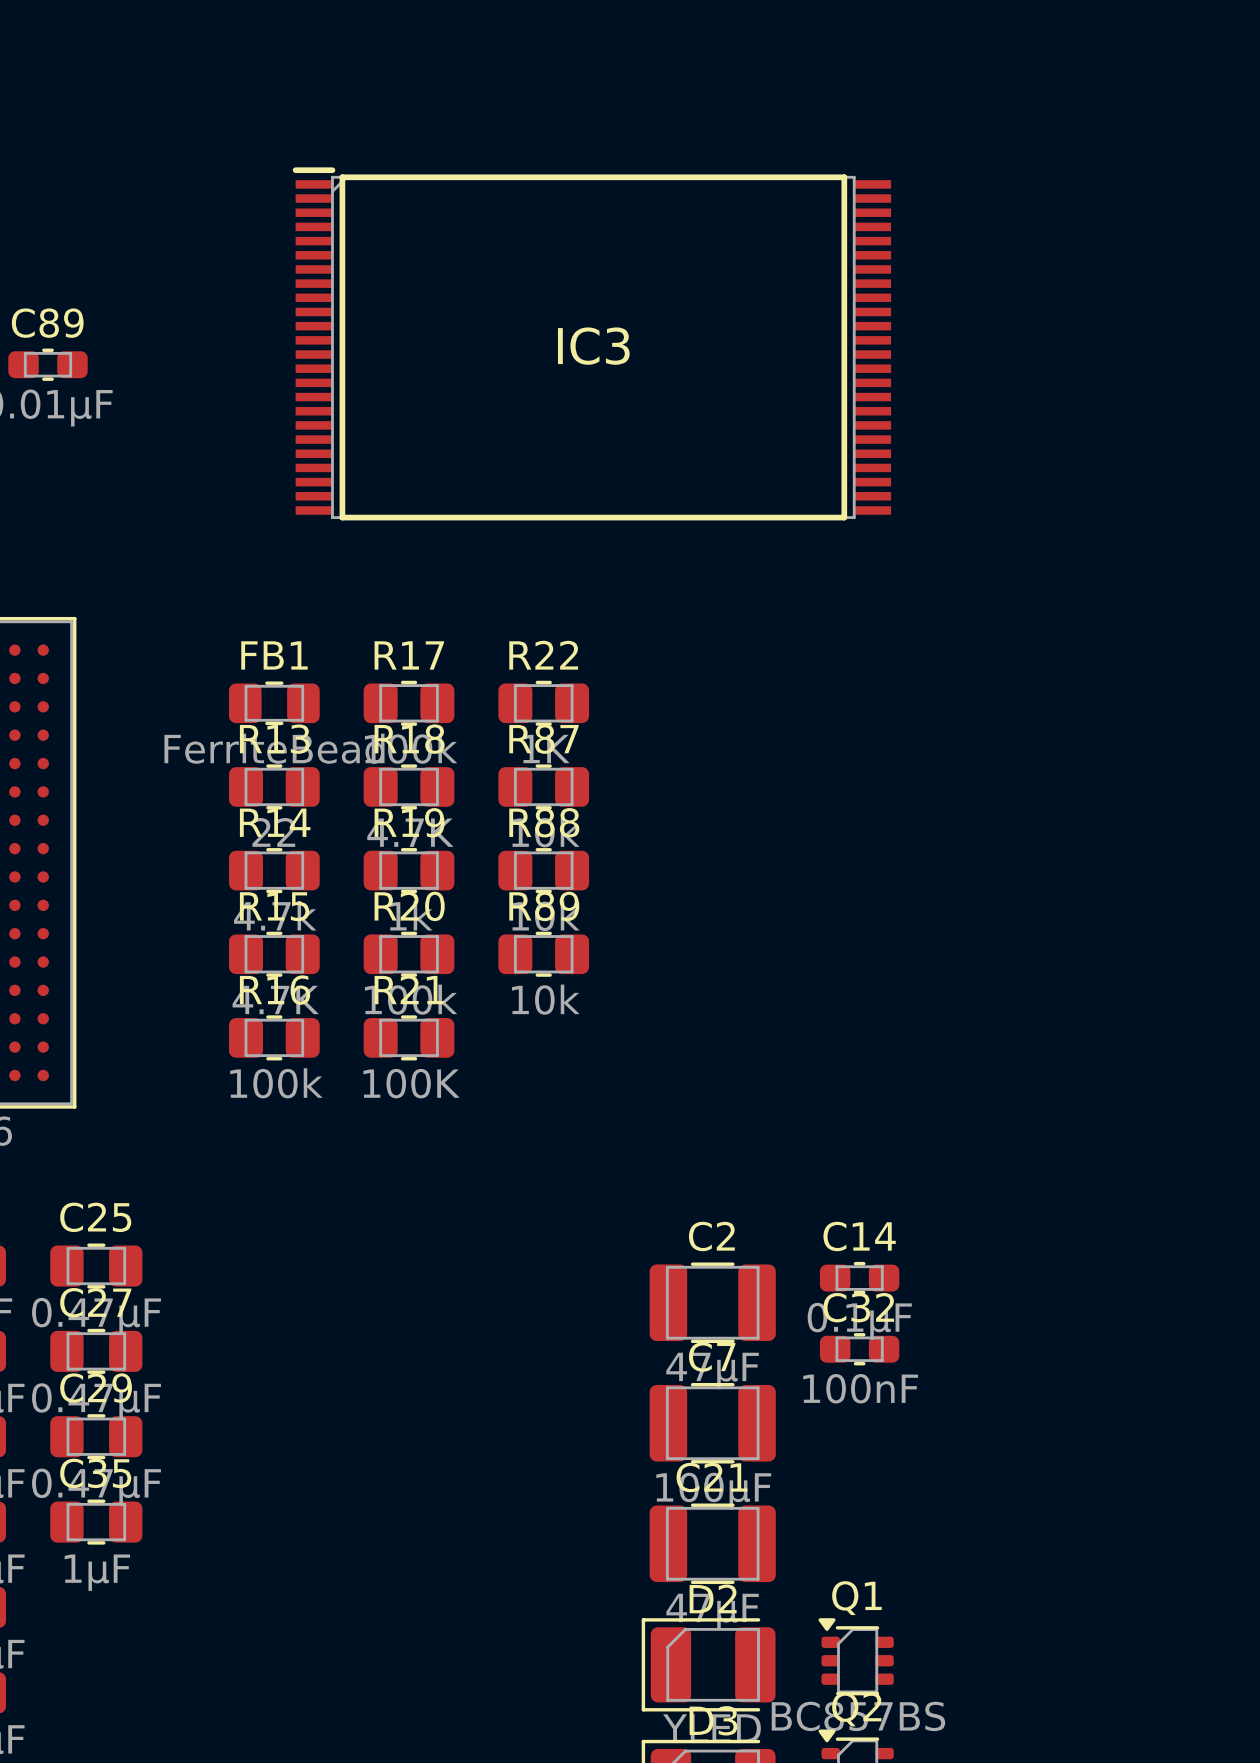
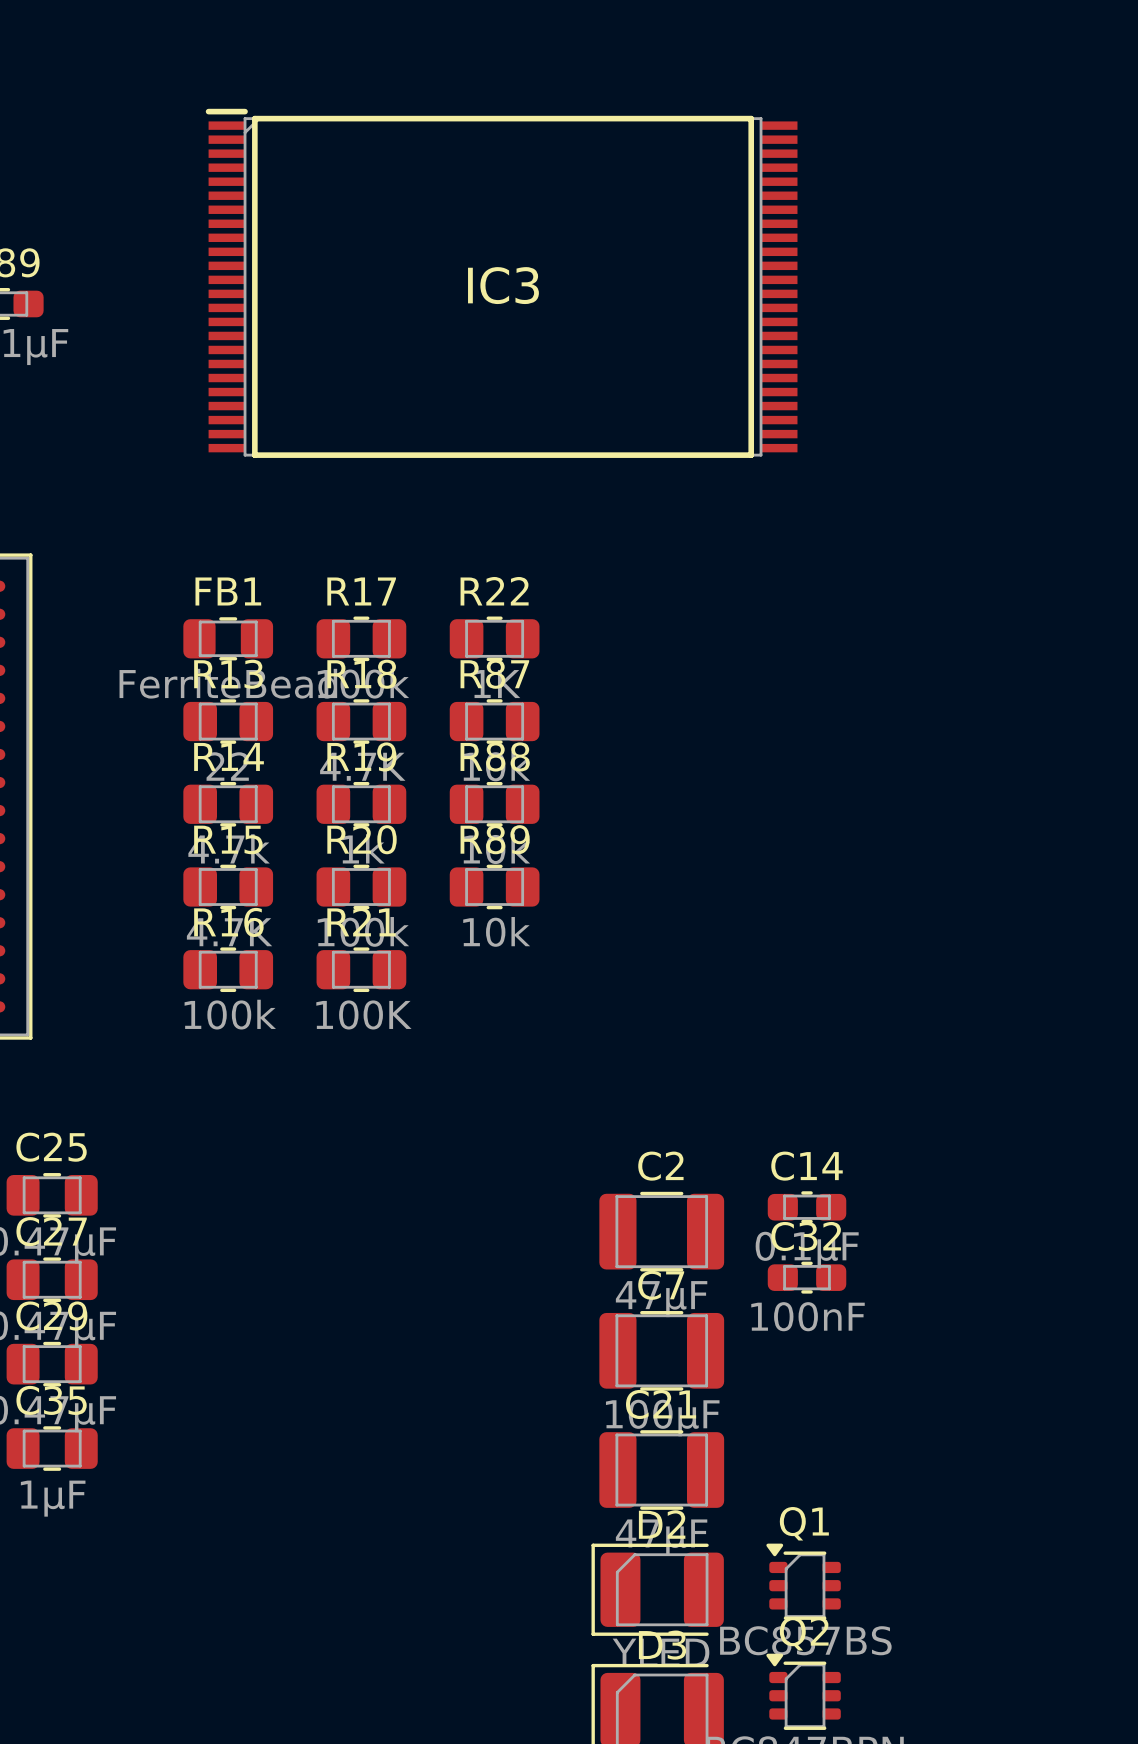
IC3 position: (591, 343) -> (501, 283)

